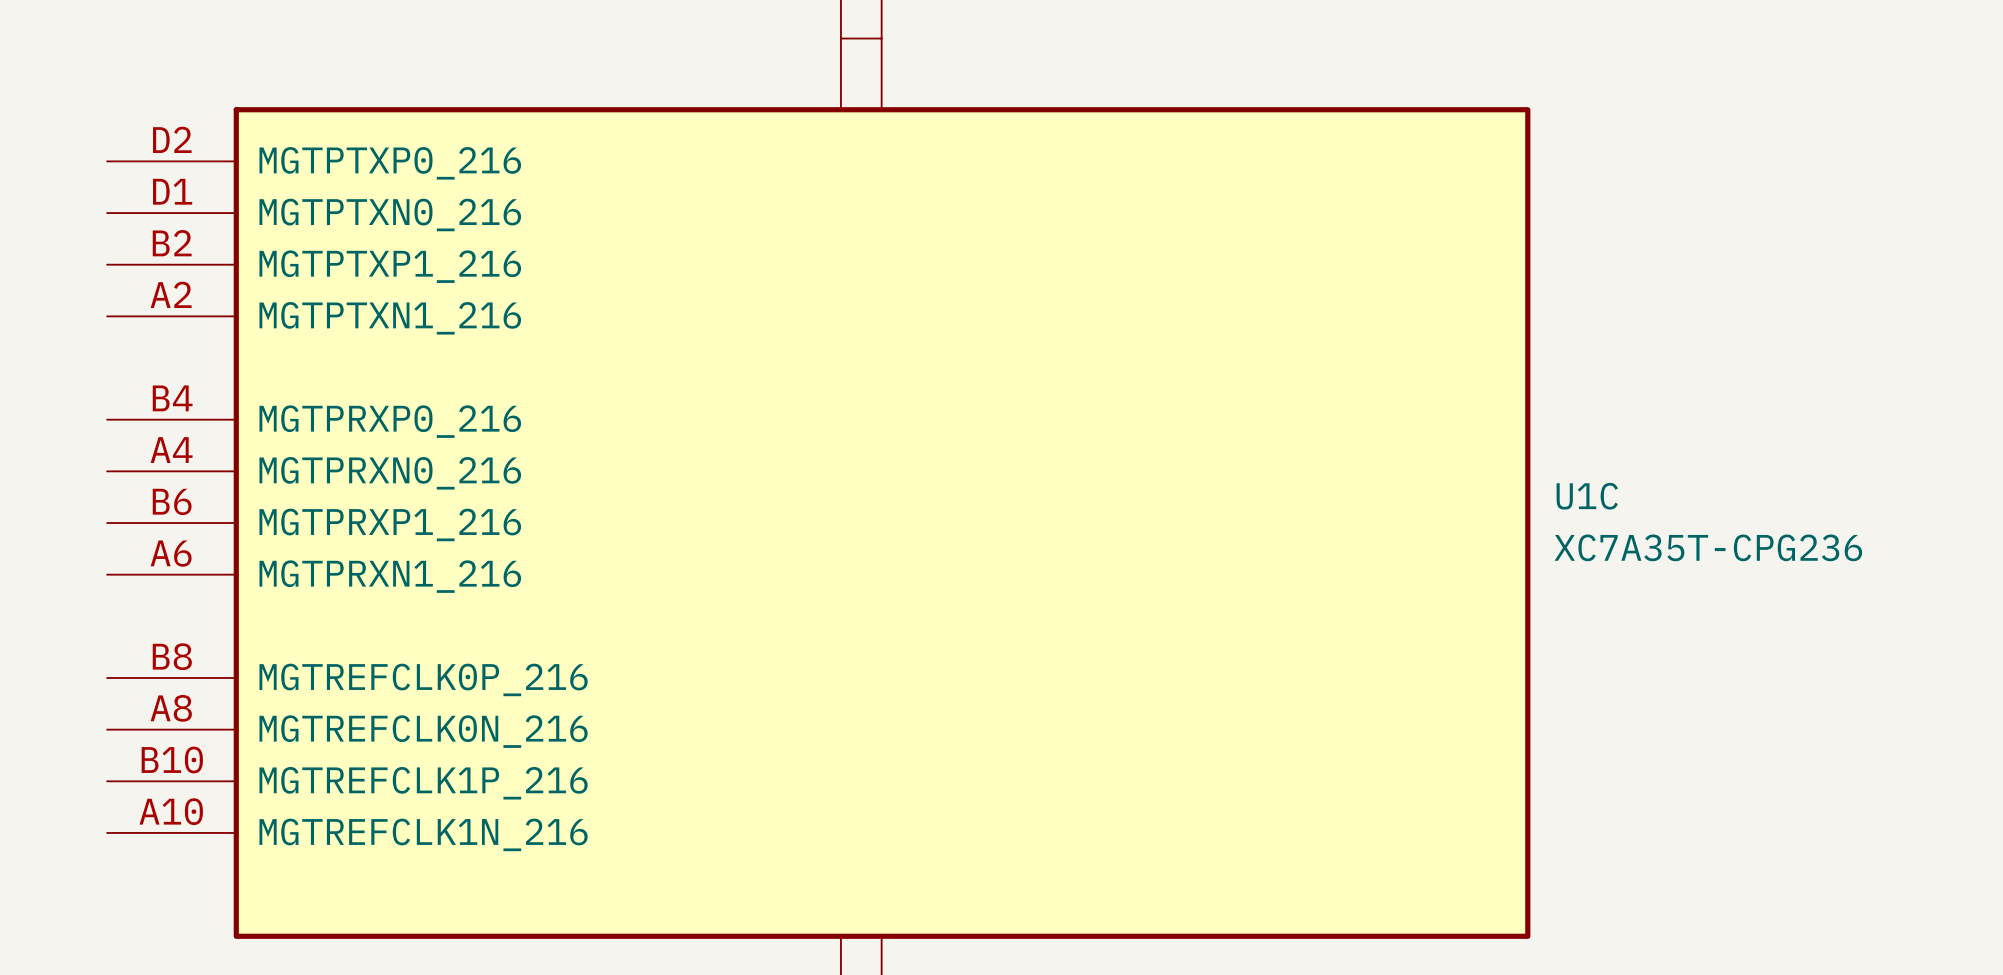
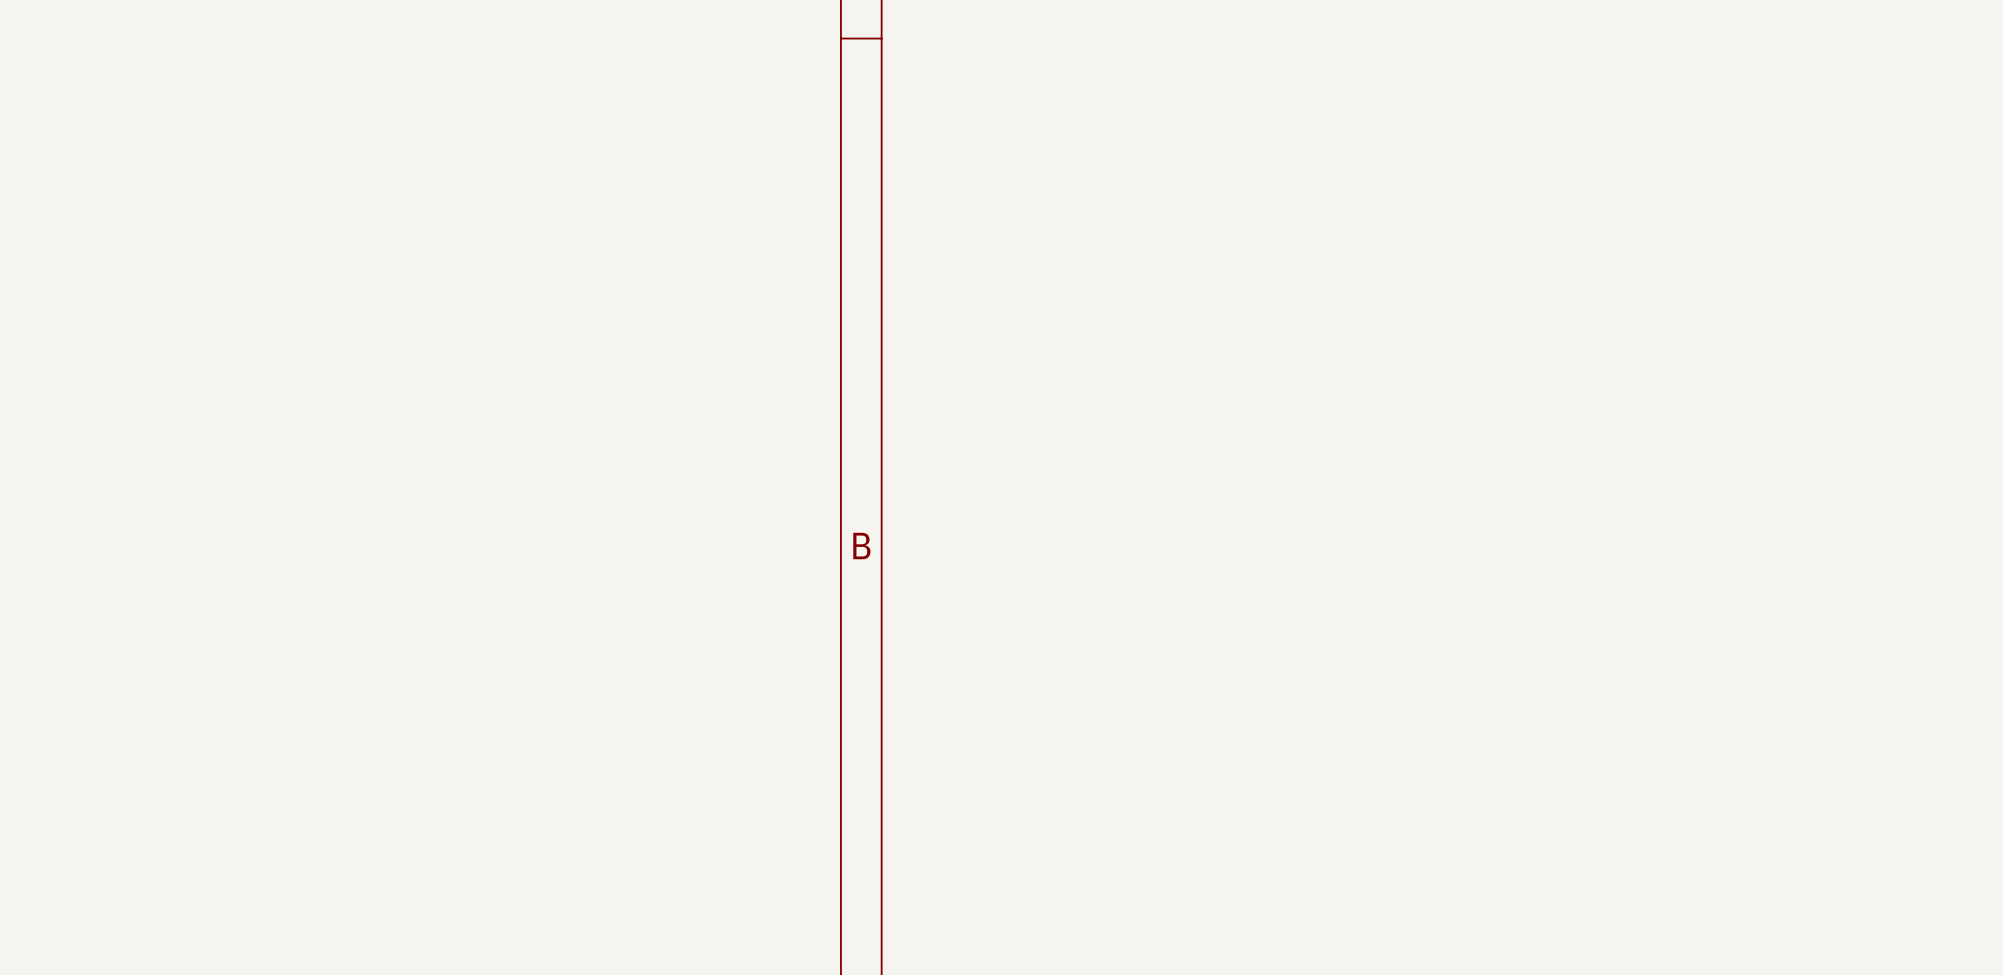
U1C: XC7A35T-CPG236 (818, 523) -> none

